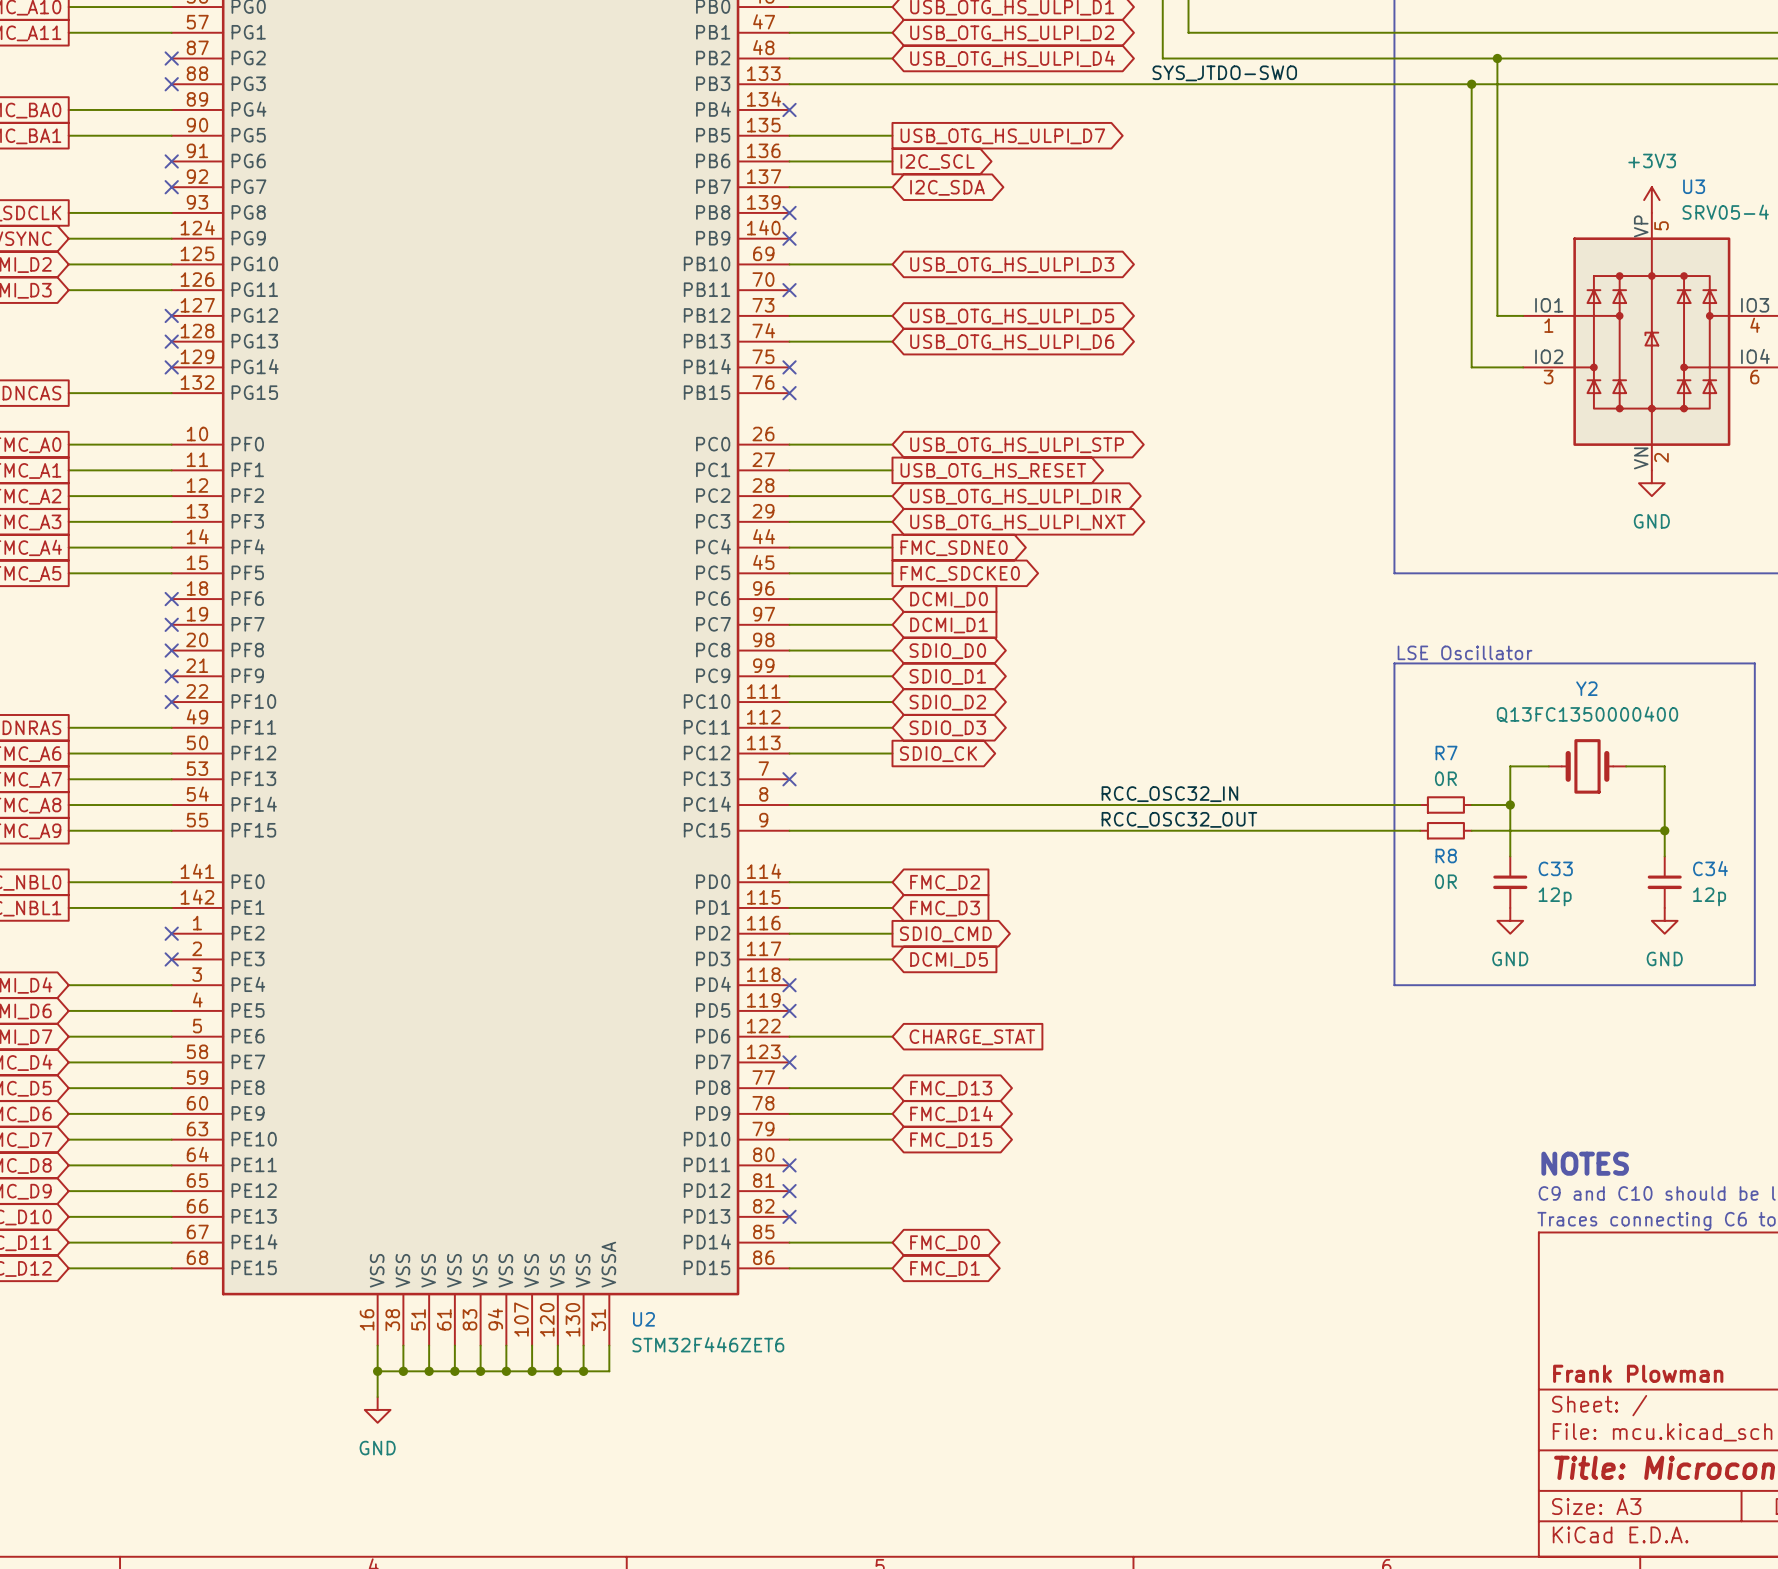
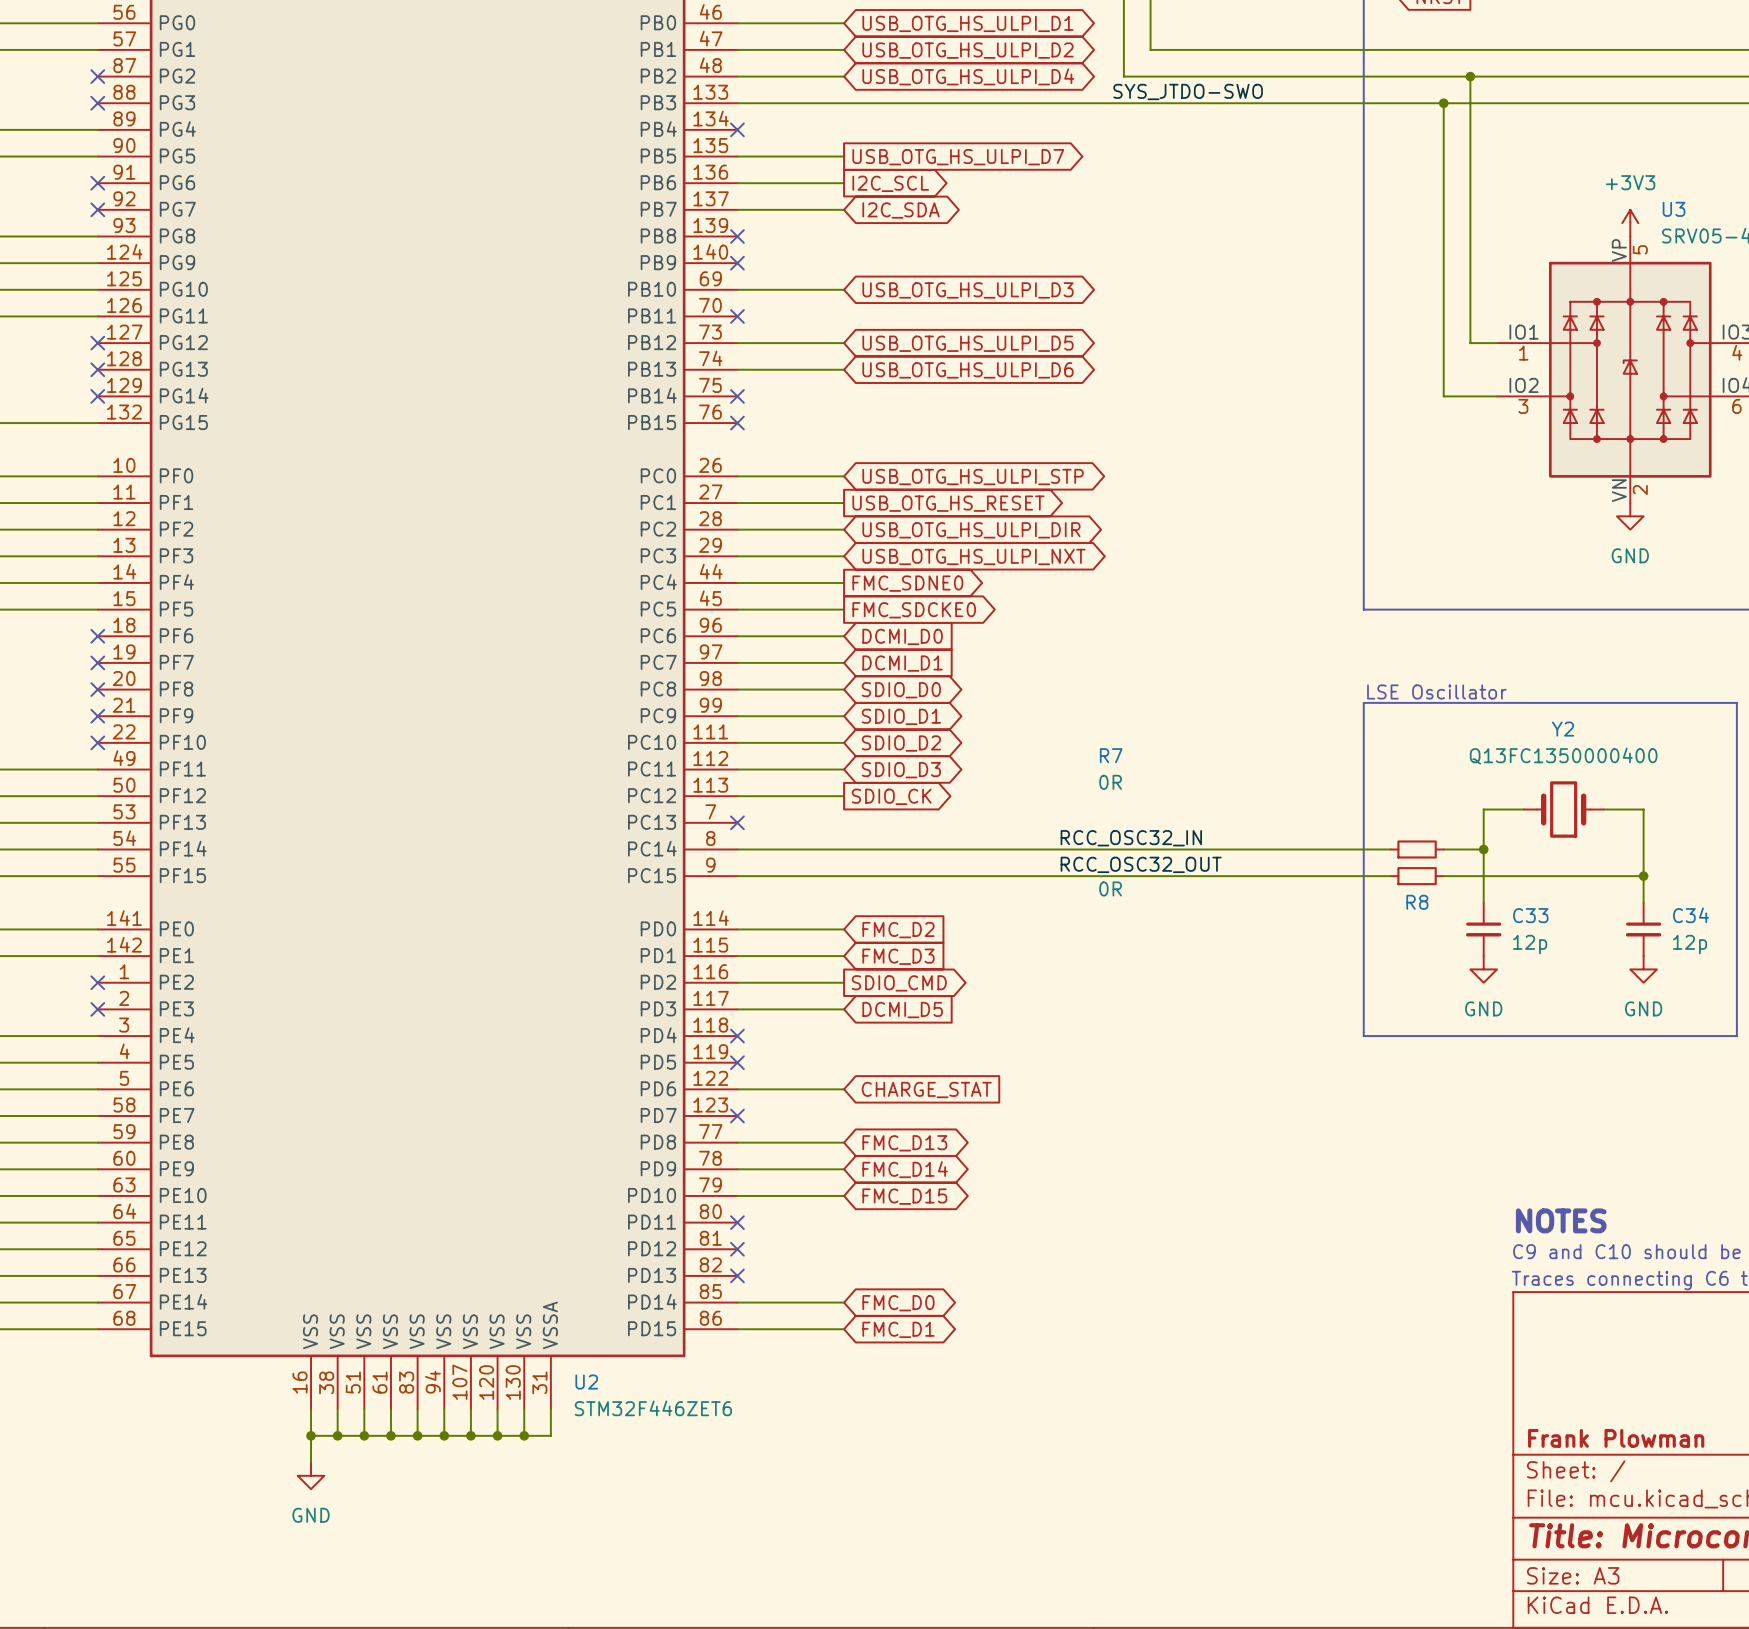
R7 name position: R7 (1446, 753) -> R7 (1111, 755)
R7 value position: 0R (1445, 778) -> 0R (1110, 782)
R8 value position: 0R (1445, 881) -> 0R (1110, 888)

